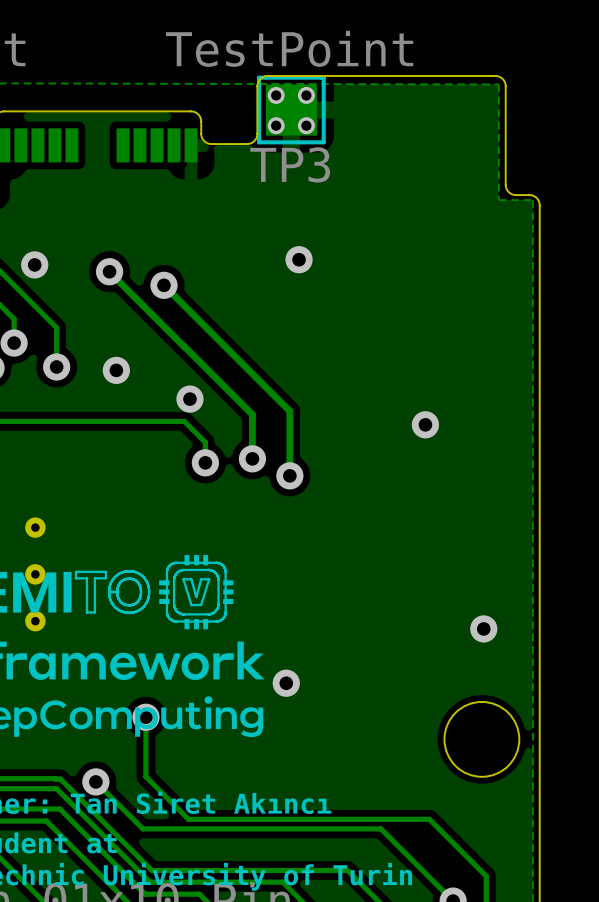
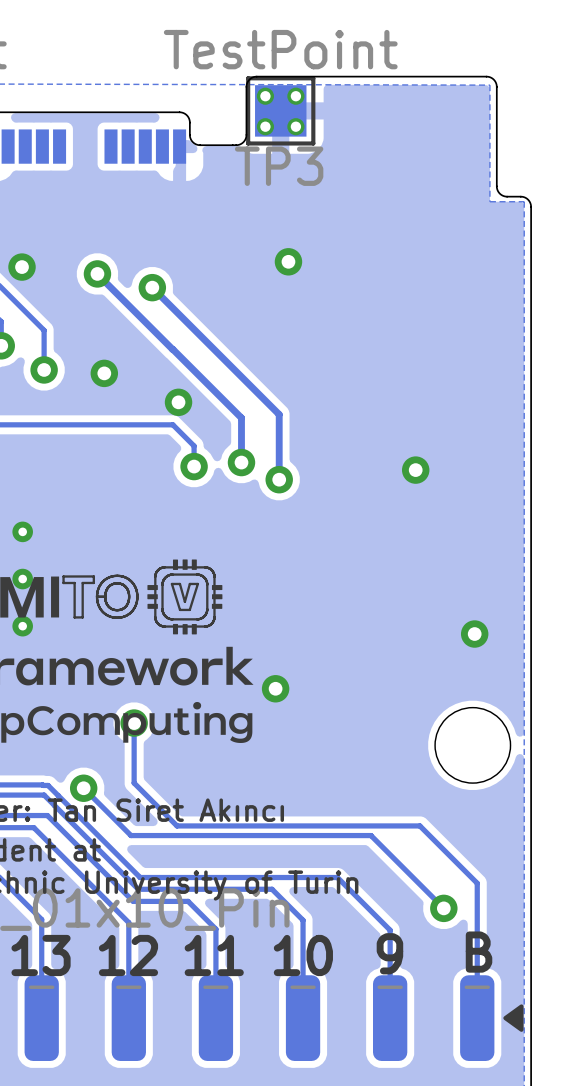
via position: (425, 424) -> (415, 470)

